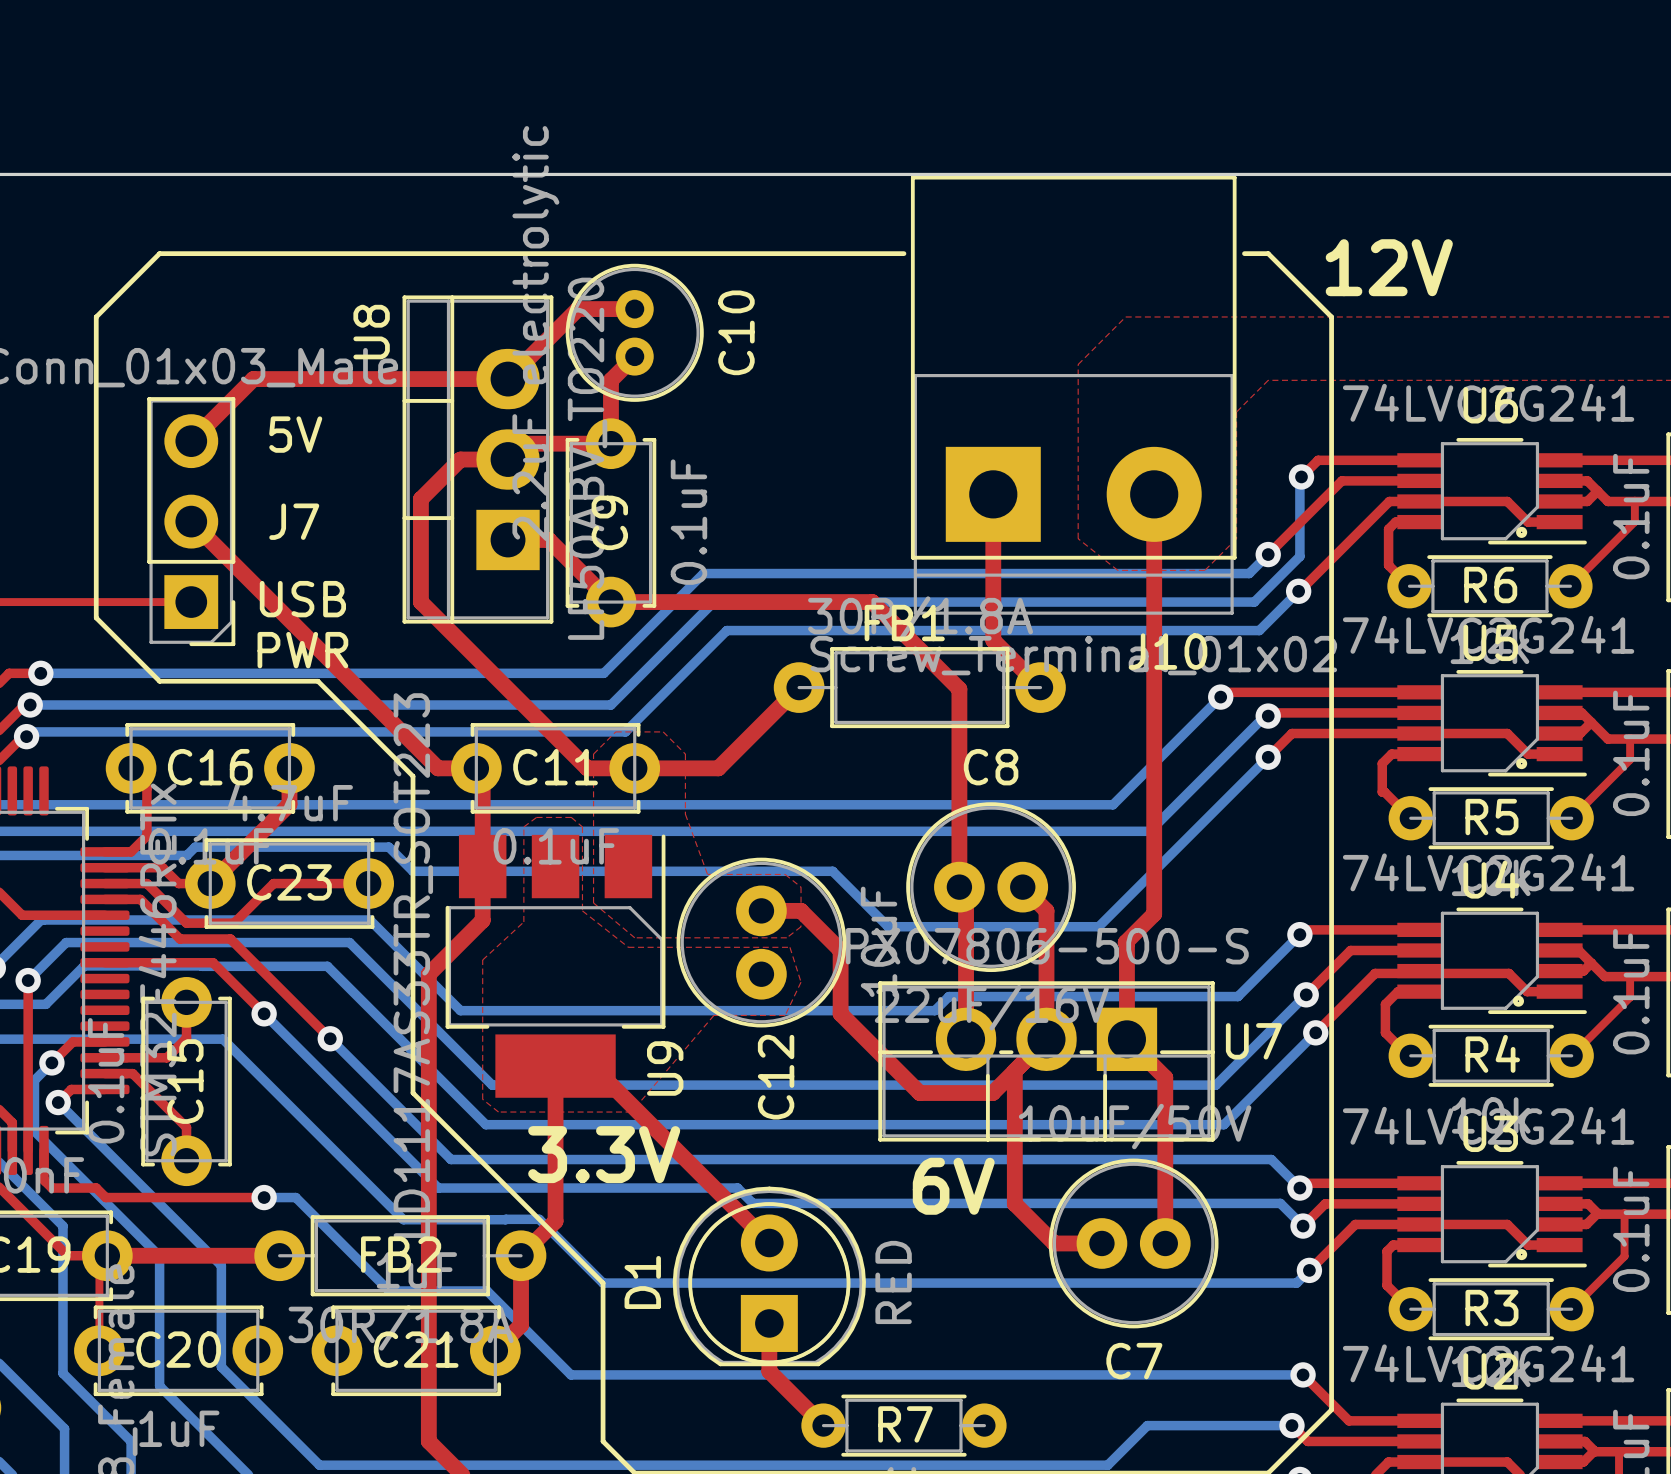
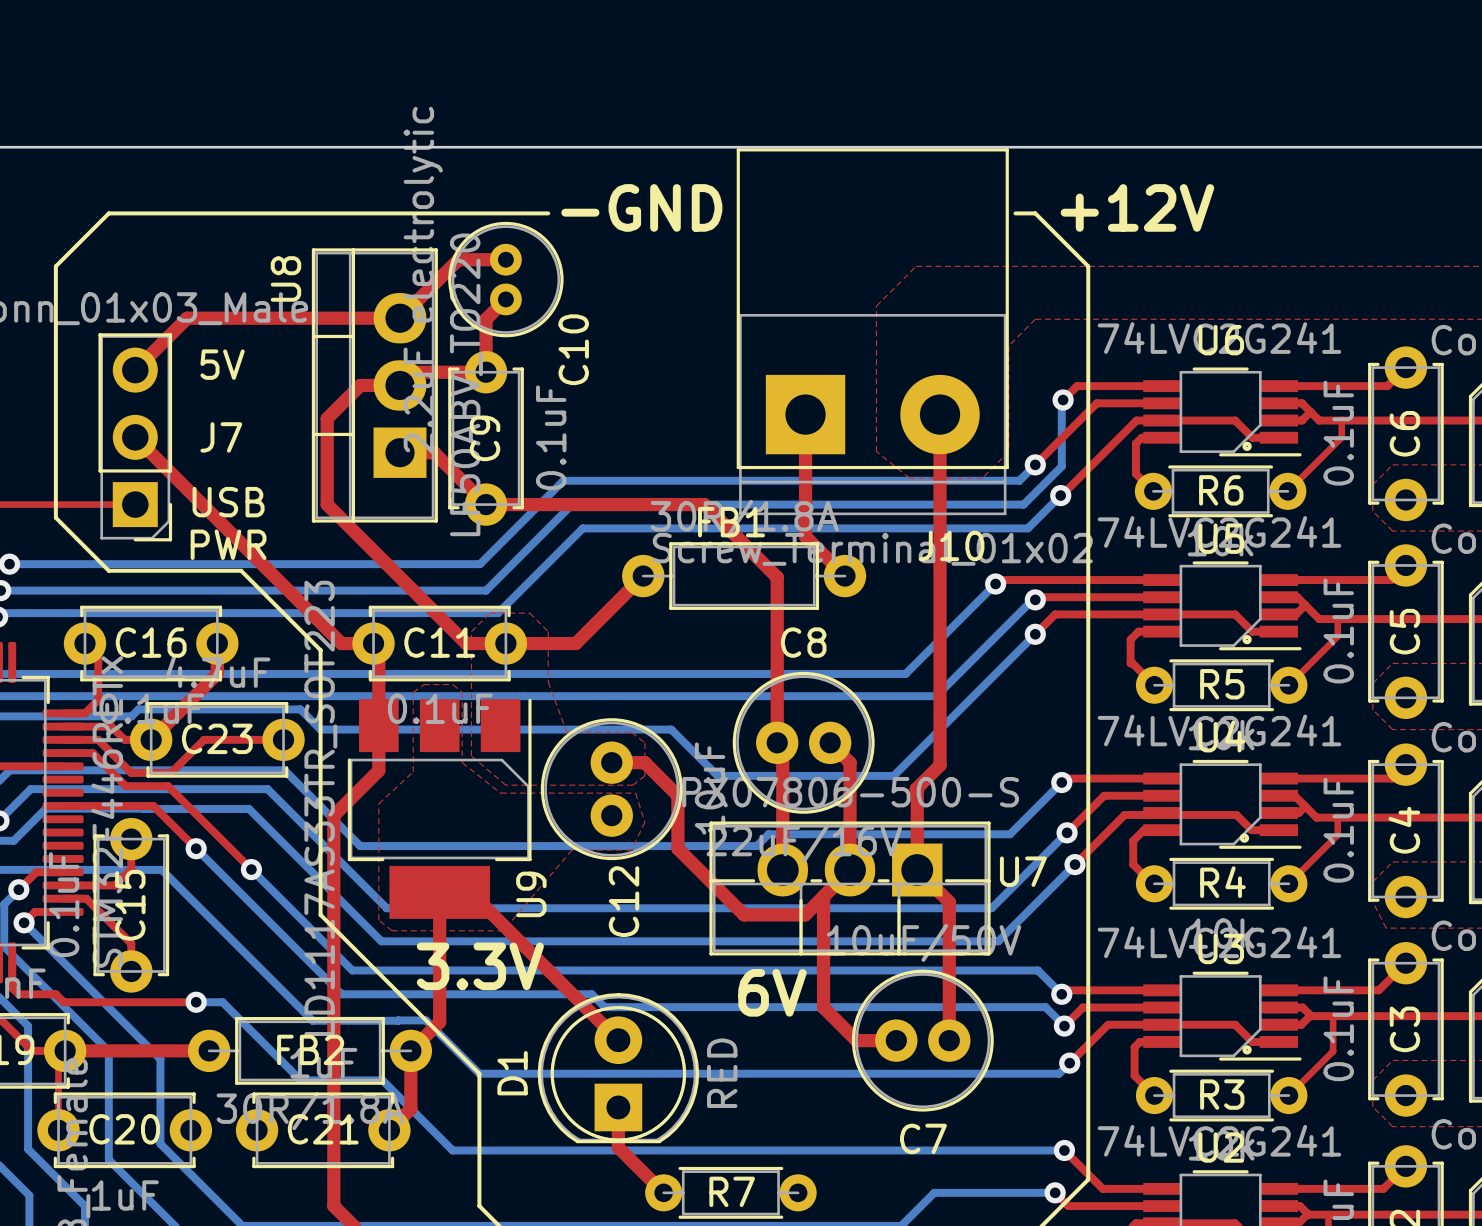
text: none -> -GND (641, 207)
line: (685, 253) (903, 253) -> none
text: 12V (1389, 267) -> +12V (1137, 207)
C10 name position: C10 (736, 332) -> C10 (573, 349)

